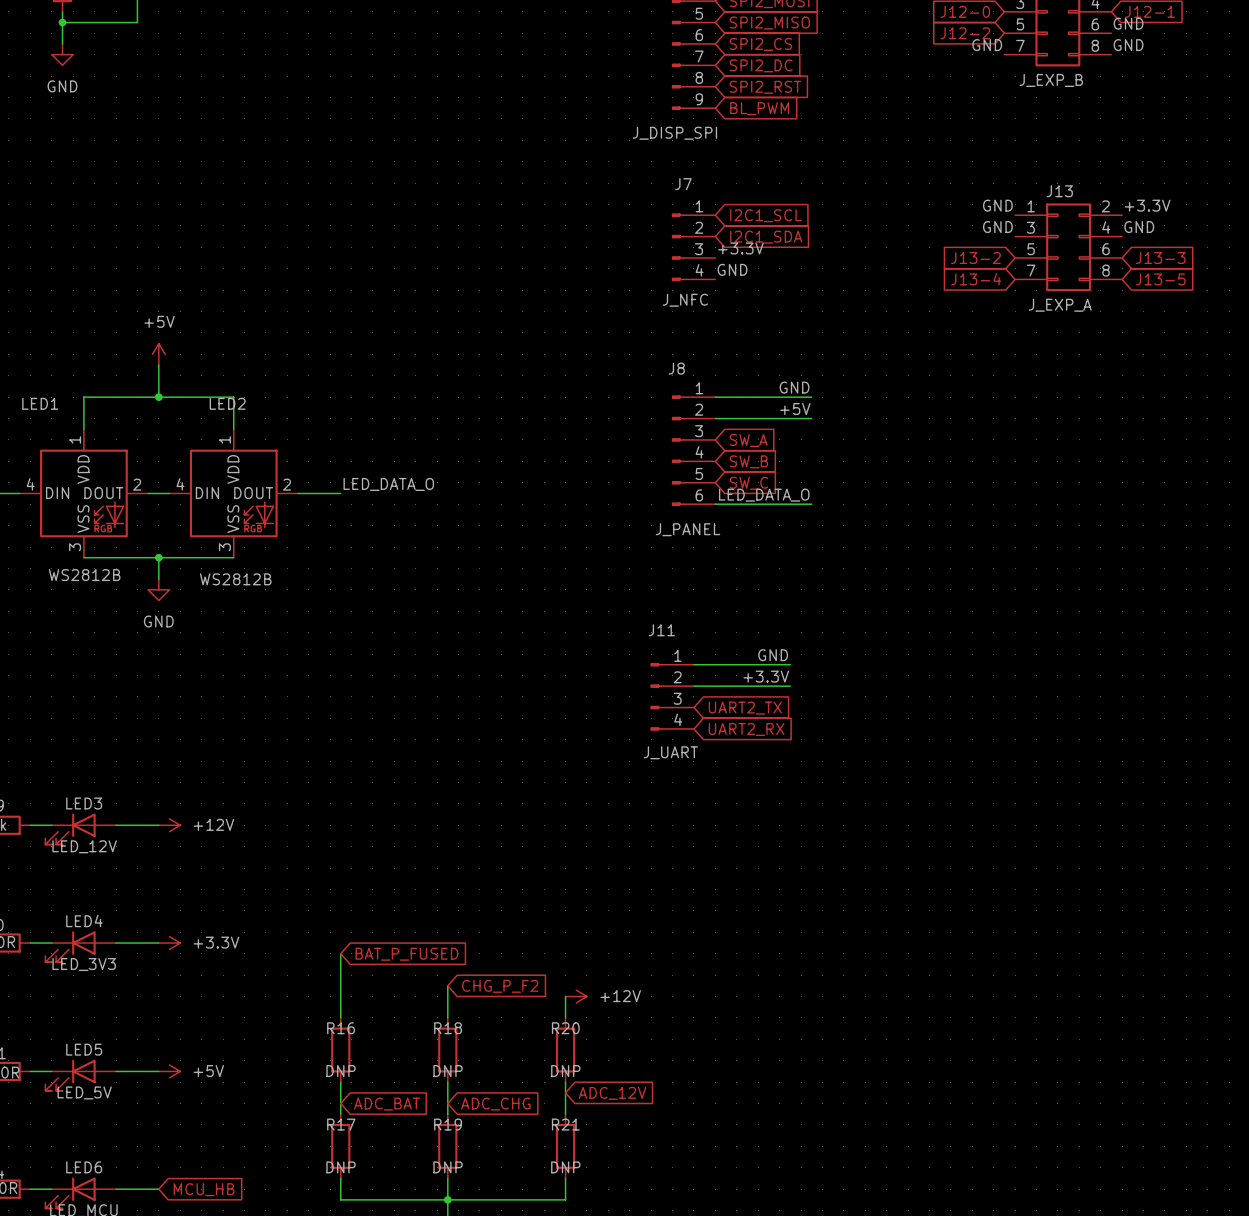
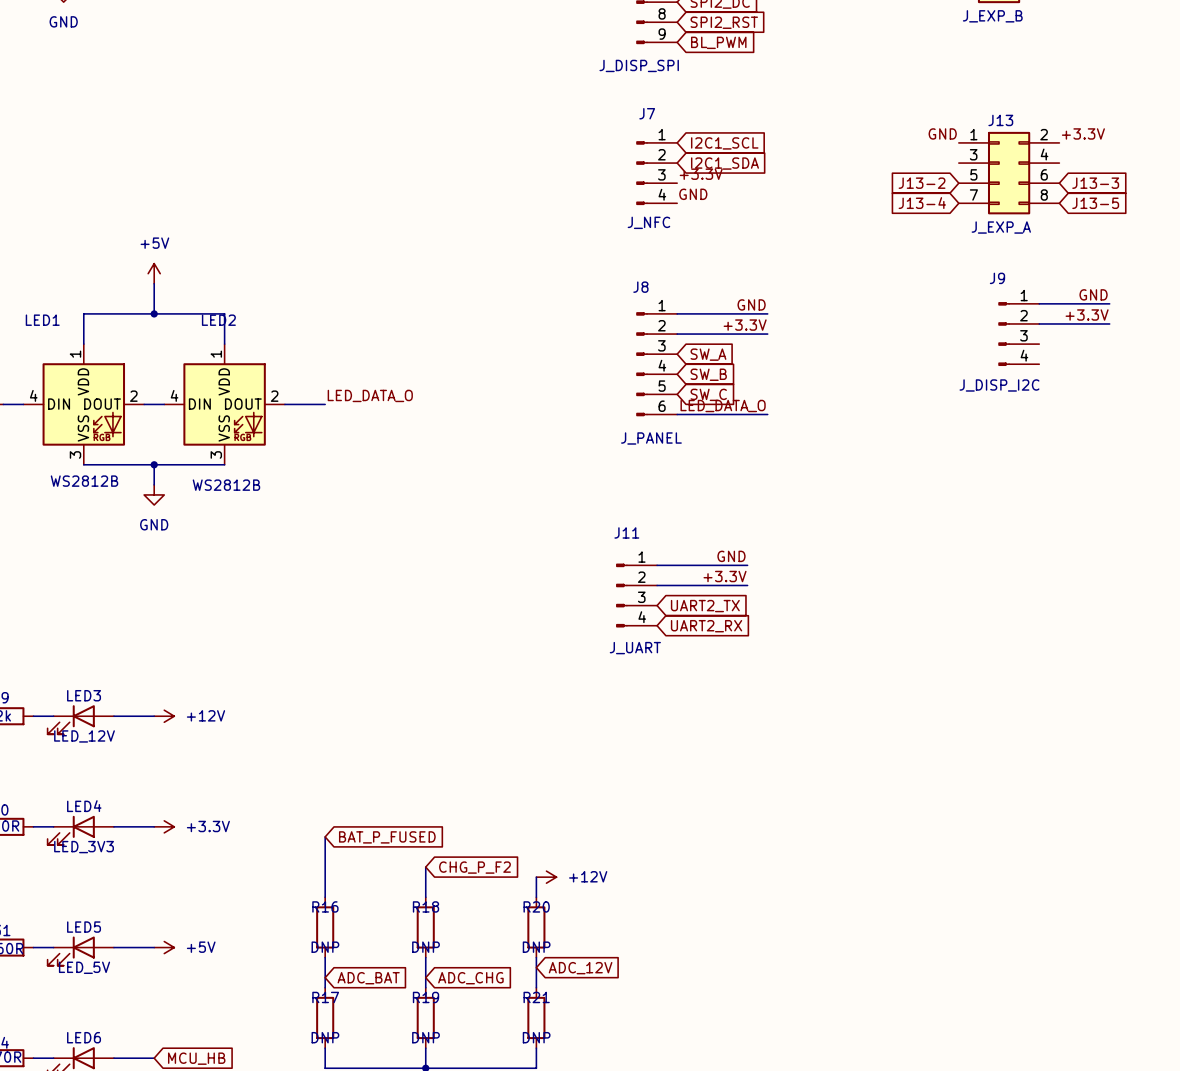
label: GND (997, 227) -> none
label: GND (1139, 227) -> none
label: none -> GND (1093, 294)
wire: none -> (1039, 303) (1109, 303)
label: none -> +3.3V (1087, 315)
wire: none -> (1039, 323) (1109, 323)
label: +5V (795, 409) -> +3.3V (745, 325)
J9: none -> J_DISP_I2C (1018, 334)

